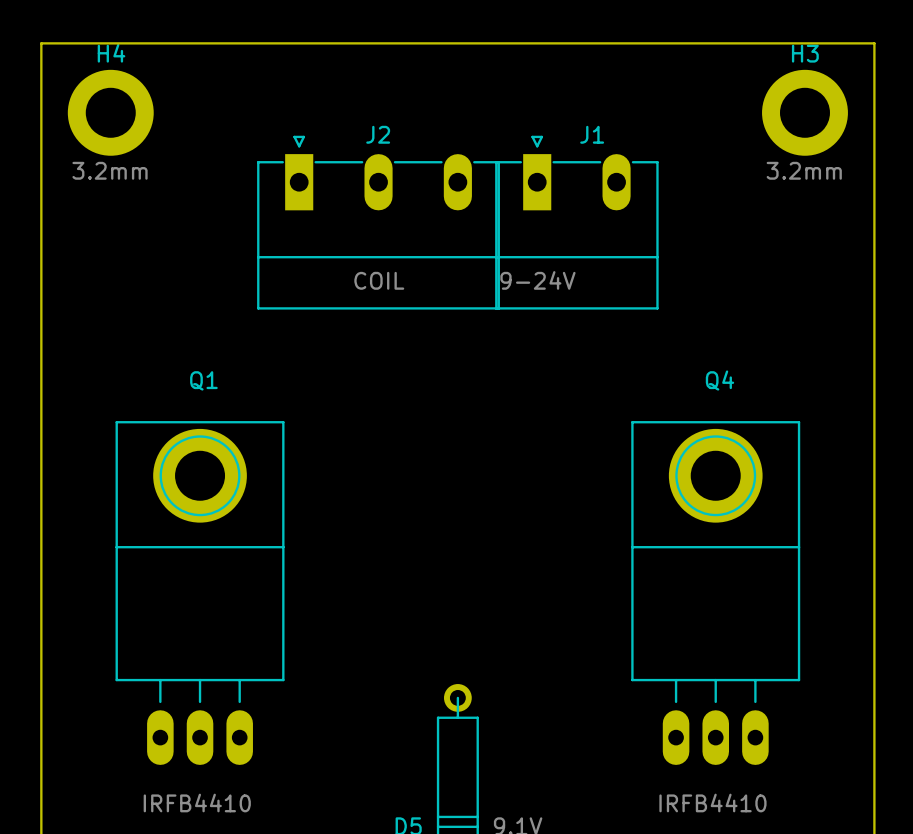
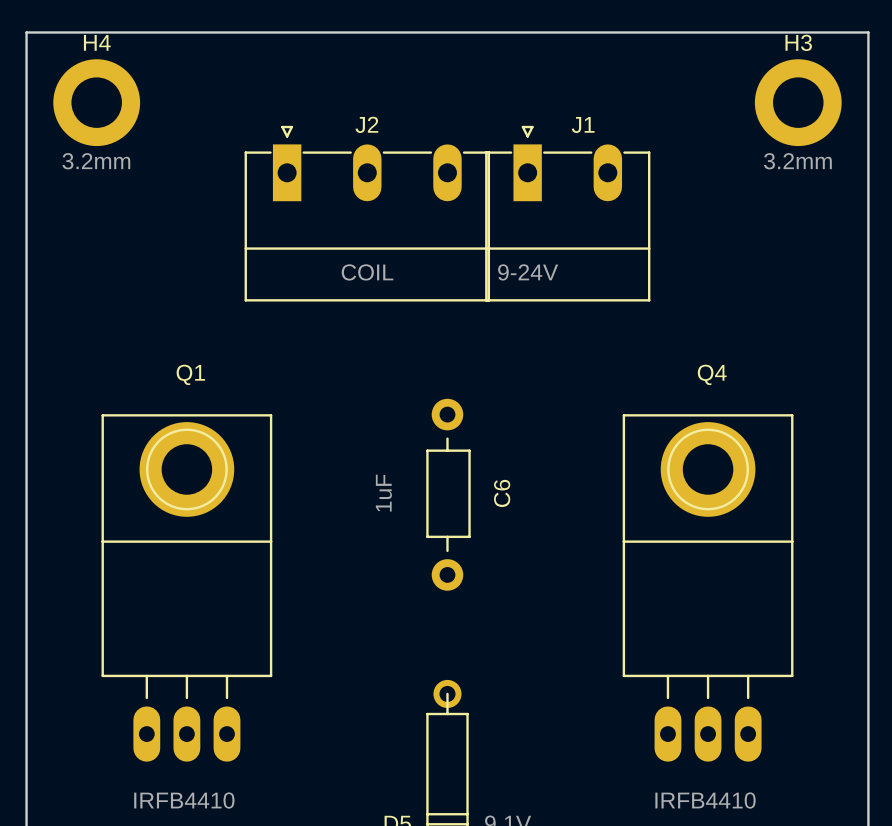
C6: none -> 1uF (448, 494)

